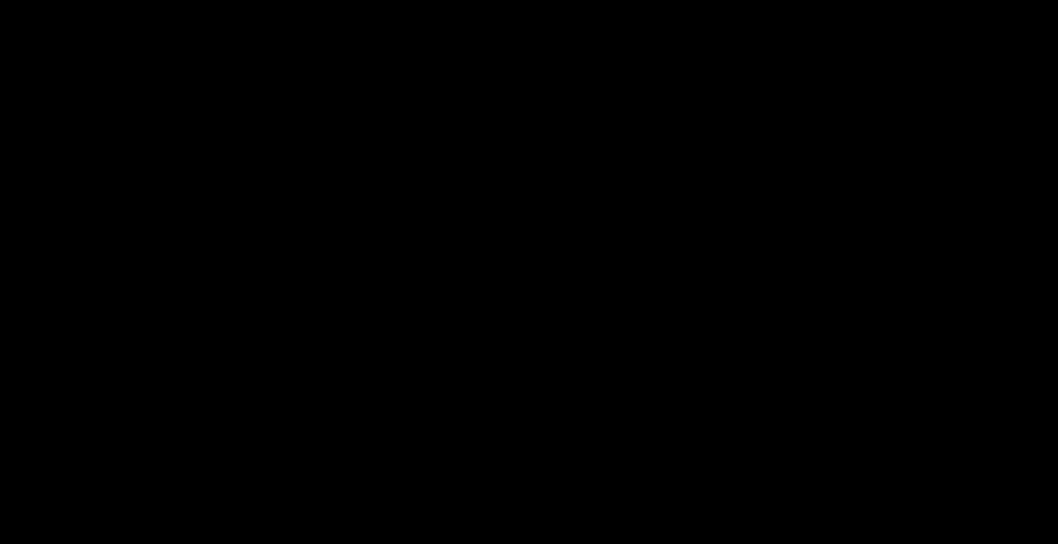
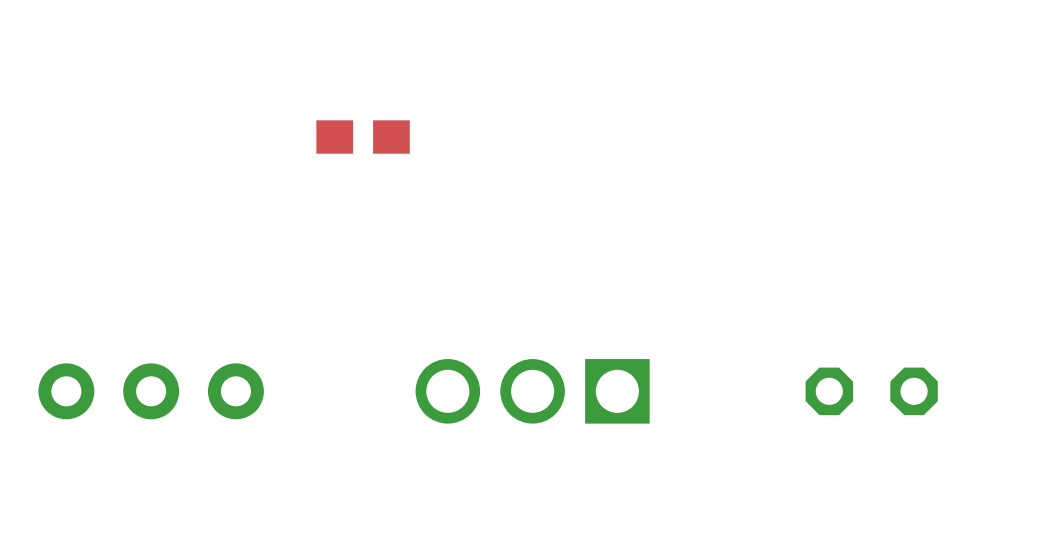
part: none -> (363, 137)
part: none -> (151, 391)
part: none -> (532, 391)
part: none -> (871, 391)

